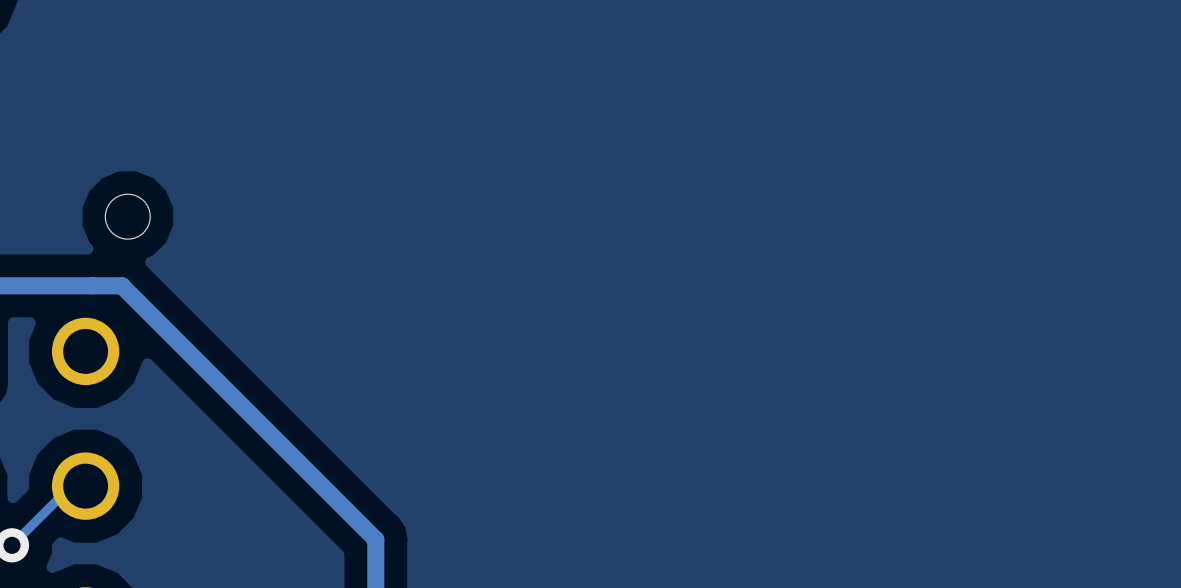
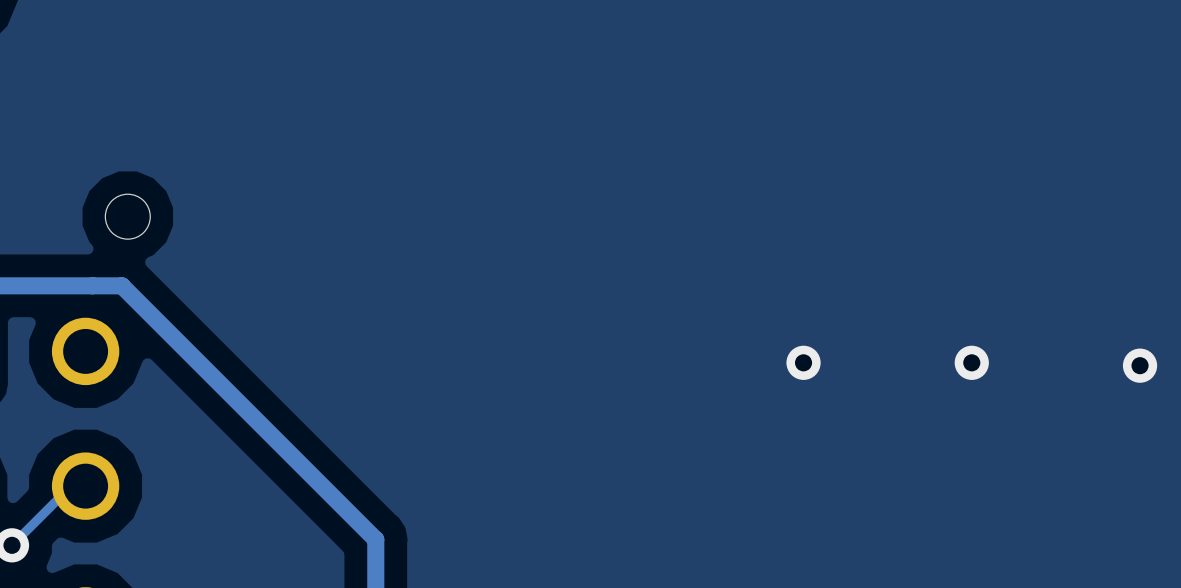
via: none -> (803, 362)
via: none -> (971, 362)
via: none -> (1140, 365)

